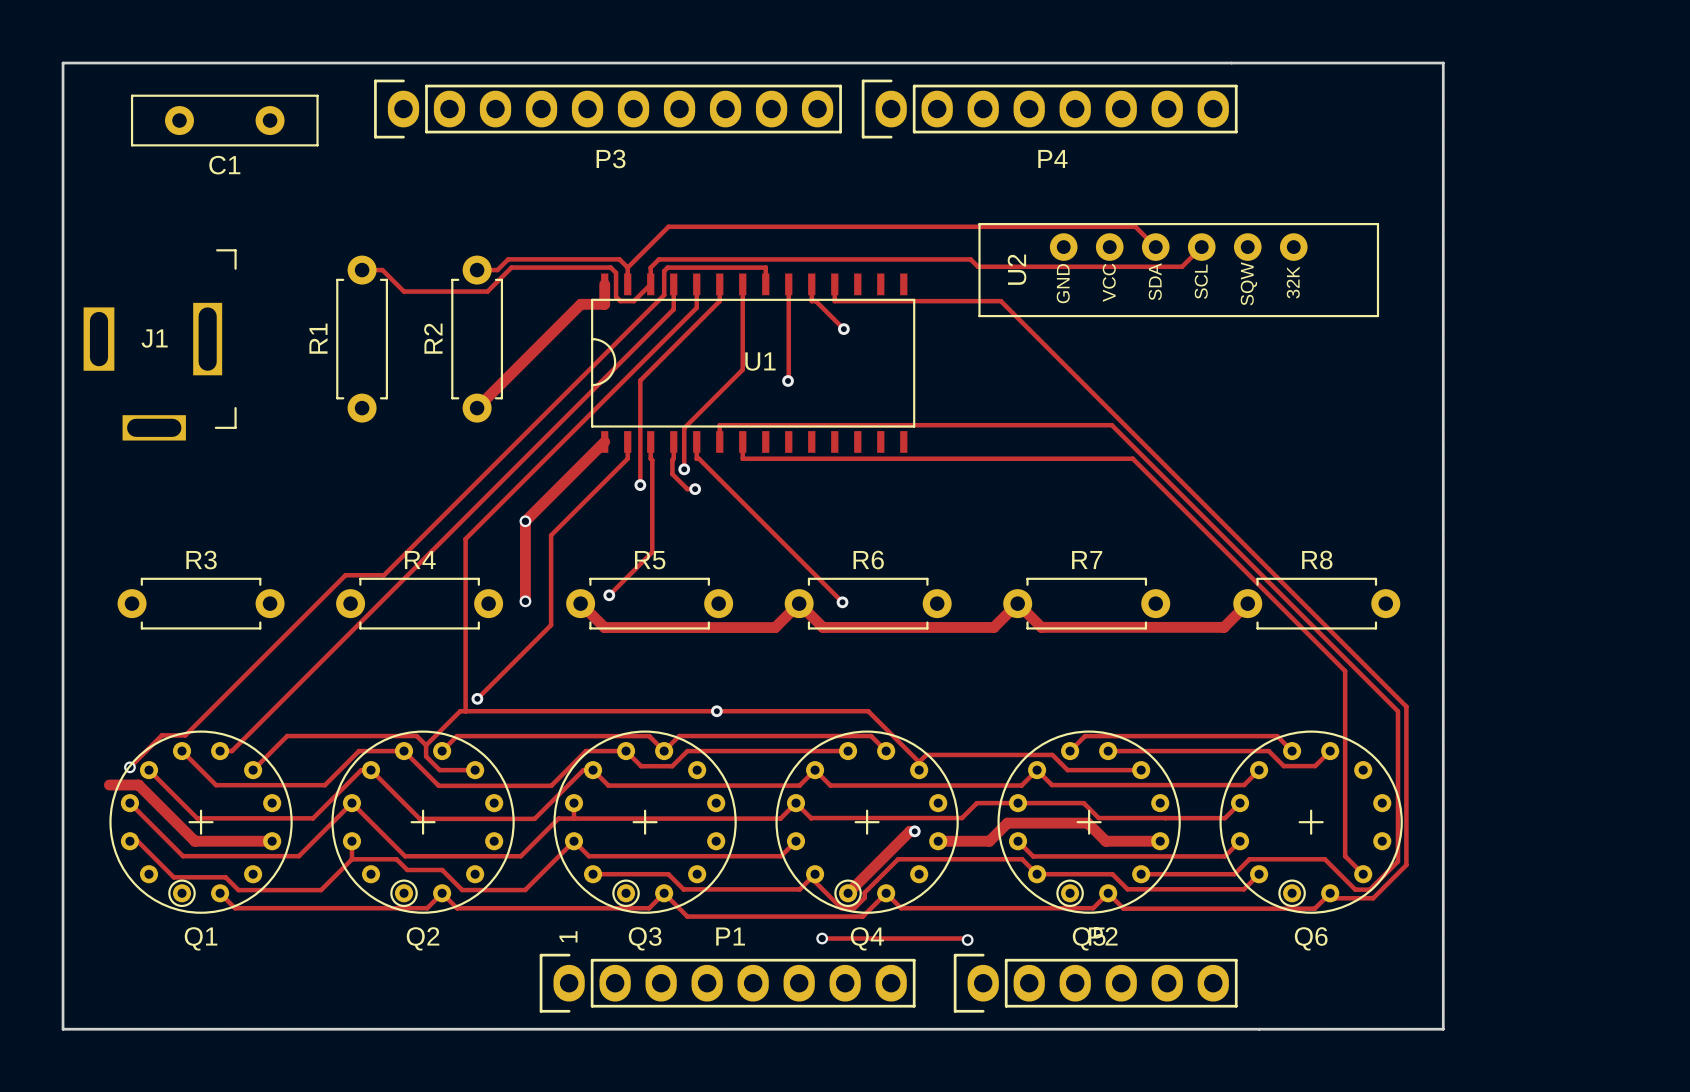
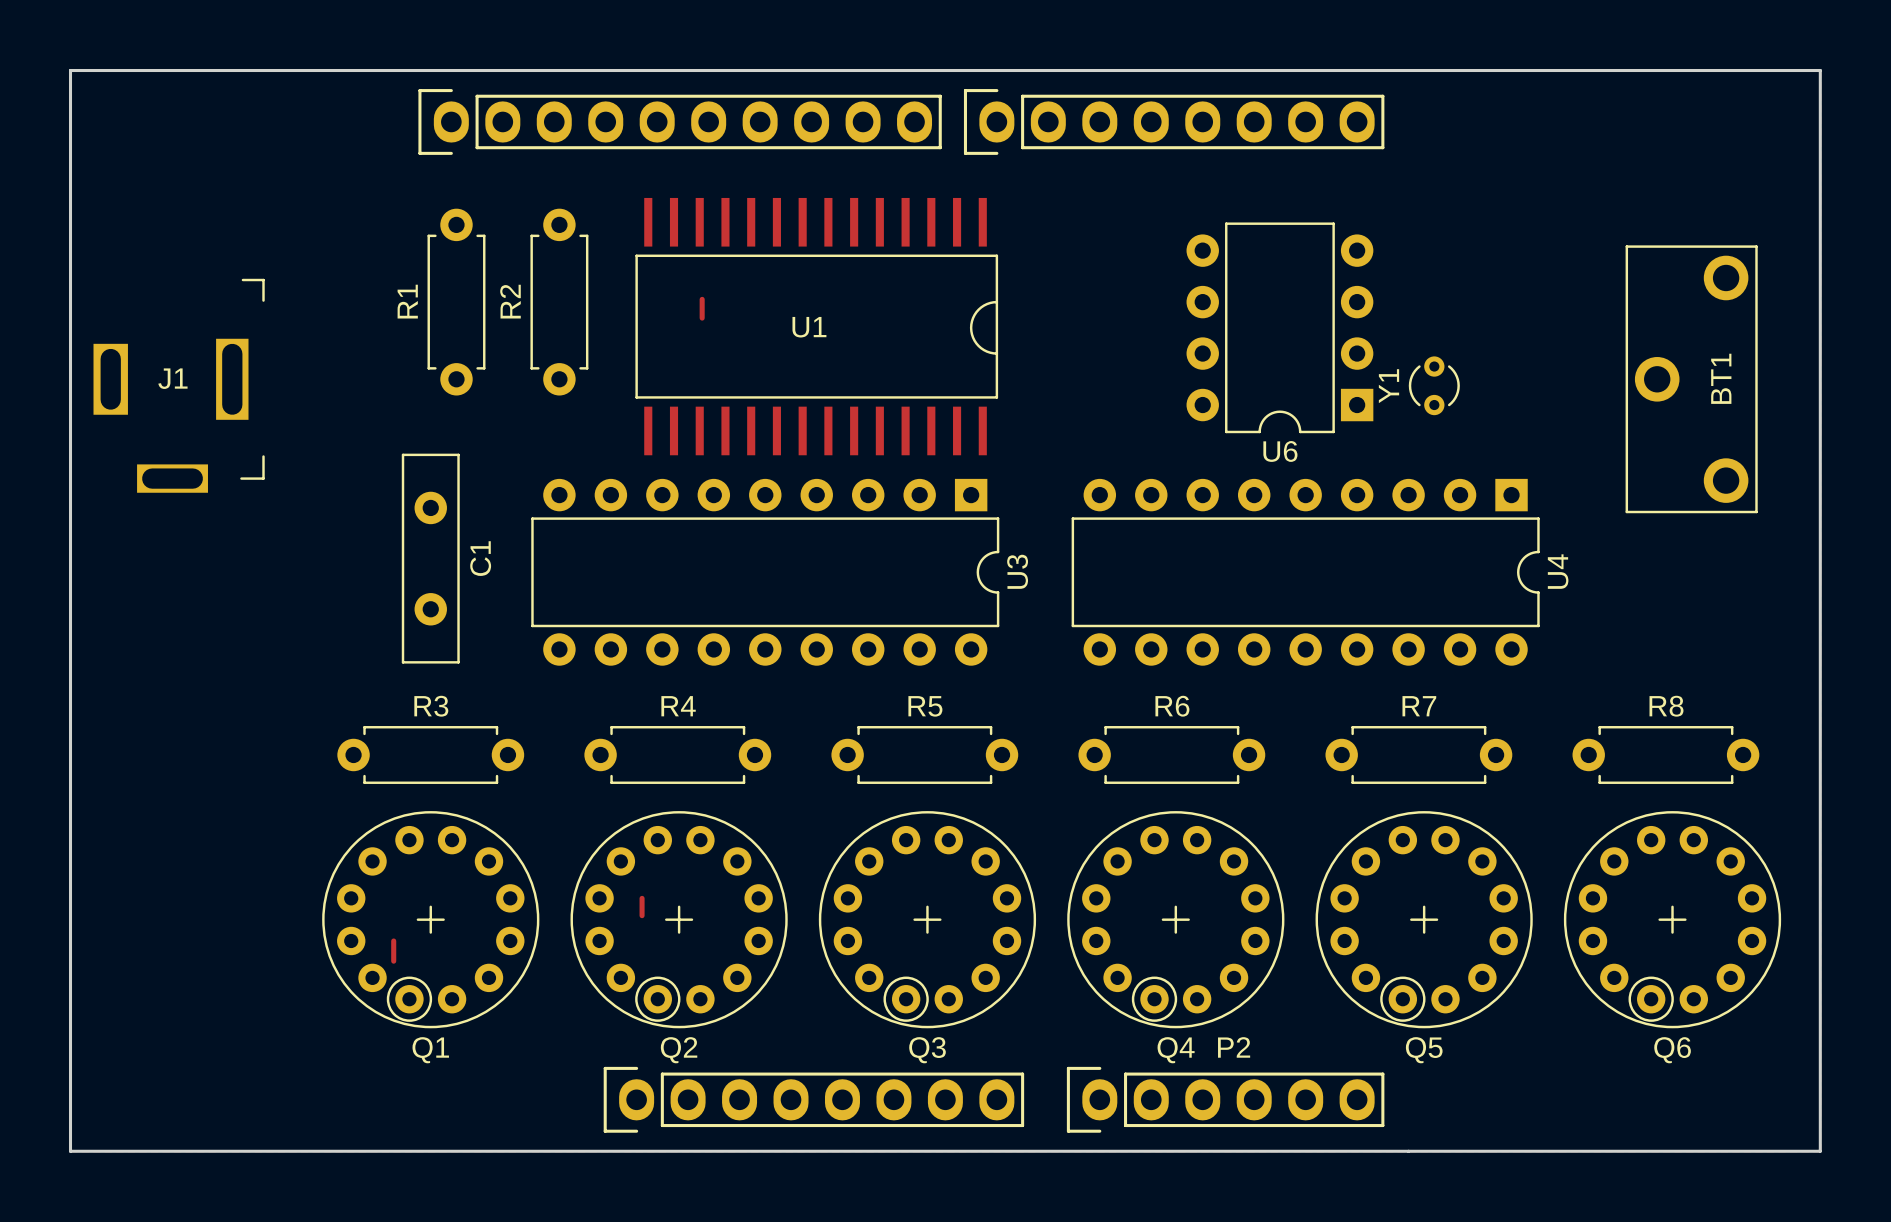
board edge: (1443, 63) (1443, 1029) -> (1614, 70) (1820, 70) (1820, 1151) (1614, 1151)
C1 rotation: 0° (224, 120) -> 90° clockwise (430, 558)
C1 position: (224, 120) -> (430, 558)
P3 name: P3 (611, 158) -> none
P4 name: P4 (1052, 158) -> none
C1 name position: C1 (224, 165) -> C1 (480, 558)
track: (1155, 247) (1135, 226) (668, 226) (627, 267) (619, 259) (508, 259) (497, 270) (477, 270) -> none
track: (1201, 247) (1182, 266) (978, 266) (970, 259) (658, 259) (650, 267) (650, 284) (633, 301) (620, 301) (616, 296) (616, 272) (610, 267) (511, 267) (487, 291) (403, 291) (382, 270) (362, 270) -> none
U2: (1178, 270) -> none
U1 footprint: [591, 273, 916, 453] -> [635, 197, 999, 456]
track: (604, 284) (604, 304) (580, 304) (477, 408) -> none
track: (673, 284) (673, 309) (231, 751) (220, 751) -> none
track: (696, 284) (696, 307) (465, 539) (465, 711) -> none
track: (719, 284) (719, 301) (640, 380) (640, 485) -> none
track: (742, 284) (742, 369) (684, 428) (684, 469) -> none
track: (765, 284) (765, 267) (667, 267) (664, 271) (664, 295) (383, 575) (345, 575) (185, 735) (161, 735) (129, 767) -> none
track: (788, 284) (788, 380) -> none
track: (811, 284) (811, 301) (815, 301) (843, 329) -> none
track: (834, 284) (834, 301) (1000, 301) (1406, 706) (1406, 865) (1373, 898) (1335, 898) (1330, 893) (1314, 908) (1123, 908) (1108, 893) (1093, 908) (901, 908) (886, 893) (862, 916) (687, 916) (664, 893) (649, 908) (457, 908) (442, 893) (427, 908) (235, 908) (220, 893) -> none
U6: none -> (1279, 327)
via: (843, 329) -> none
R1 position: (362, 339) -> (456, 302)
R2 position: (477, 339) -> (559, 302)
BT1: none -> (1691, 379)
Y1: none -> (1434, 385)
via: (788, 380) -> none
track: (604, 441) (525, 521) (525, 601) -> none
track: (627, 441) (627, 458) (551, 535) (551, 625) (477, 698) -> none
track: (650, 441) (652, 552) (609, 595) -> none
track: (673, 441) (672, 474) (687, 489) (695, 489) -> none
track: (696, 441) (696, 458) (698, 458) (842, 602) -> none
track: (719, 441) (719, 425) (1111, 425) (1397, 711) (1397, 861) (1369, 889) (1355, 889) (1324, 859) (1249, 859) (1234, 874) (1141, 874) -> none
track: (742, 441) (742, 458) (1132, 458) (1345, 671) (1345, 856) (1363, 874) -> none
via: (684, 469) -> none
via: (640, 485) -> none
via: (695, 489) -> none
U3: none -> (765, 572)
U4: none -> (1305, 572)
via: (525, 521) -> none
via: (609, 595) -> none
via: (525, 601) -> none
via: (842, 602) -> none
R3 position: (201, 603) -> (430, 754)
R4 position: (419, 603) -> (677, 754)
track: (580, 603) (604, 627) (775, 627) (799, 603) (822, 627) (993, 627) (1017, 603) (1041, 627) (1224, 627) (1247, 603) -> none
R5 position: (649, 603) -> (924, 754)
R6 position: (868, 603) -> (1171, 754)
R7 position: (1086, 603) -> (1418, 754)
R8 position: (1316, 603) -> (1665, 754)
via: (477, 698) -> none
via: (716, 711) -> none
Q1 footprint: [109, 730, 293, 914] -> [322, 811, 540, 1029]
Q2 footprint: [331, 730, 515, 914] -> [570, 811, 788, 1029]
Q3 footprint: [553, 730, 737, 914] -> [818, 811, 1037, 1029]
Q4 footprint: [775, 730, 959, 914] -> [1067, 811, 1285, 1029]
Q5 footprint: [997, 730, 1181, 914] -> [1315, 811, 1533, 1029]
Q6 footprint: [1219, 730, 1403, 914] -> [1563, 811, 1782, 1029]
track: (426, 745) (460, 711) (868, 711) (919, 762) -> none
track: (426, 745) (426, 756) (439, 770) (475, 770) -> none
track: (426, 745) (416, 736) (287, 736) (253, 770) -> none
track: (182, 751) (216, 785) (324, 785) (359, 751) (404, 751) (438, 785) (551, 785) (586, 751) (626, 751) (641, 766) (672, 766) (687, 751) (848, 751) -> none
track: (442, 751) (457, 736) (649, 736) (664, 751) (679, 736) (871, 736) (886, 751) -> none
track: (1070, 751) (1085, 736) (1277, 736) (1292, 751) -> none
track: (1108, 751) (1268, 751) (1283, 766) (1315, 766) (1330, 751) -> none
track: (919, 762) (926, 754) (1052, 754) (1067, 770) (1141, 770) -> none
via: (129, 767) -> none
track: (149, 770) (197, 818) (313, 818) (361, 770) (371, 770) (419, 818) (534, 818) (583, 770) (593, 770) (608, 785) (799, 785) (815, 770) (830, 785) (1021, 785) (1037, 770) (1052, 785) (1244, 785) (1259, 770) -> none
track: (109, 785) (138, 785) (194, 841) (272, 841) -> none
track: (129, 803) (183, 856) (298, 856) (351, 803) (405, 856) (520, 856) (558, 818) (780, 818) (796, 803) (811, 818) -> none
track: (1240, 803) (1225, 818) (1098, 818) (1083, 803) (976, 803) (962, 818) (811, 818) -> none
track: (914, 831) (909, 831) (848, 893) -> none
via: (914, 831) -> none
track: (129, 841) (137, 841) (173, 877) (225, 877) (238, 890) (321, 890) (351, 859) (396, 859) (407, 870) (442, 870) (462, 890) (525, 890) (573, 841) (588, 856) (781, 856) (796, 841) -> none
track: (938, 841) (989, 841) (1007, 823) (1087, 823) (1105, 841) (1160, 841) -> none
track: (1018, 841) (1033, 856) (1224, 856) (1240, 841) -> none
track: (593, 874) (668, 874) (683, 889) (799, 889) (815, 874) -> none
track: (1259, 874) (1244, 889) (1127, 889) (1112, 874) (1037, 874) (1022, 859) (898, 859) (864, 892) (864, 897) (854, 908) (841, 908) (811, 878) -> none
text: 1 (568, 936) -> none
P1 name: P1 (730, 936) -> none
track: (822, 938) (966, 938) (967, 940) -> none
via: (822, 938) -> none
via: (967, 940) -> none

